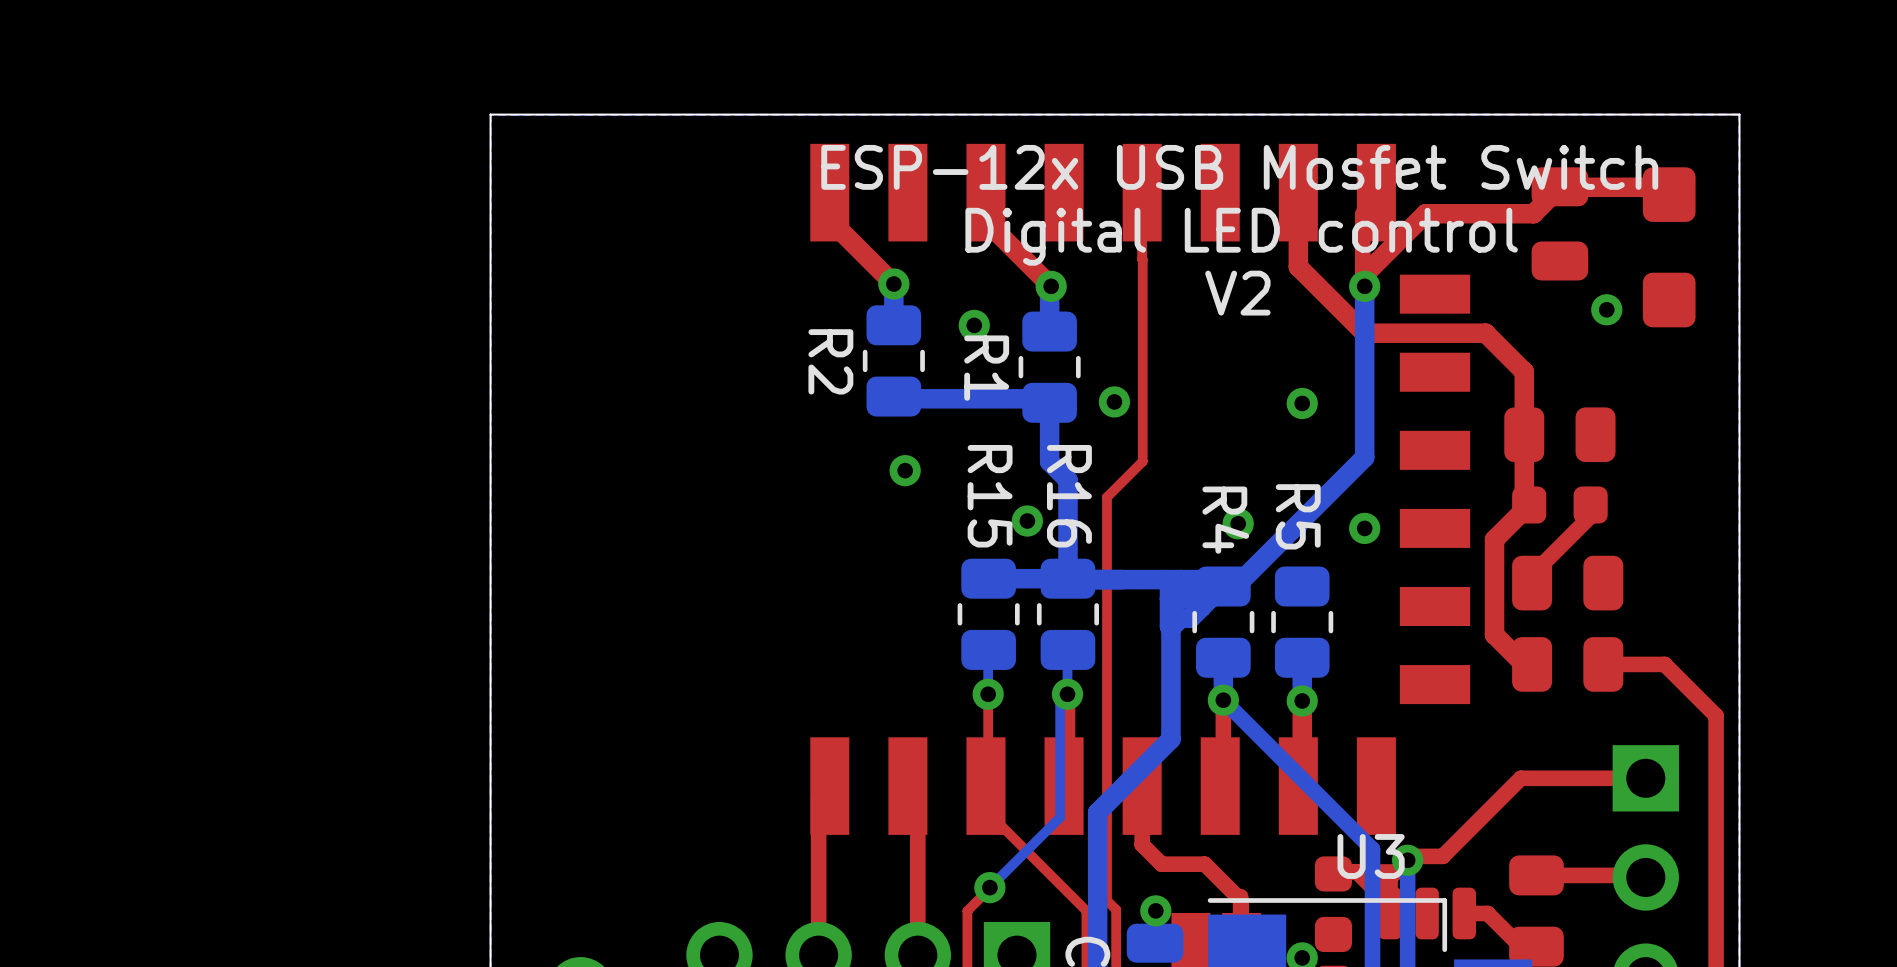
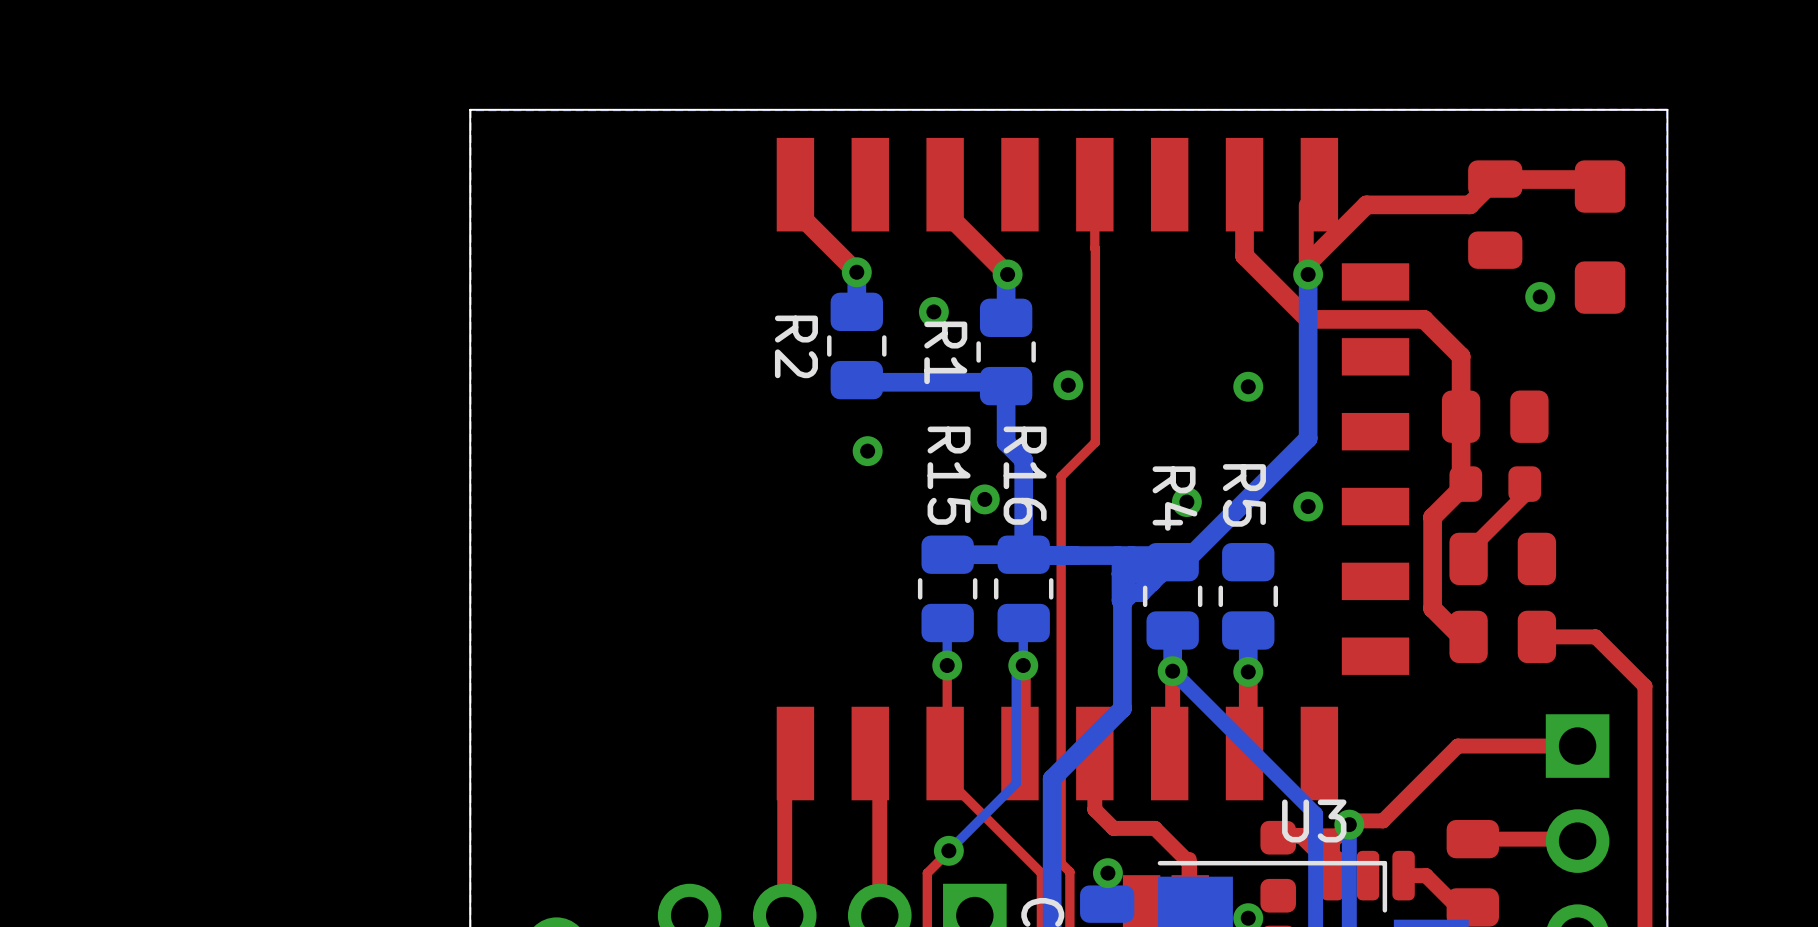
text: ESP-12x USB Mosfet Switch (1239, 167) -> none
text: Digital LED control (1241, 236) -> none
text: V2 (1237, 293) -> none

